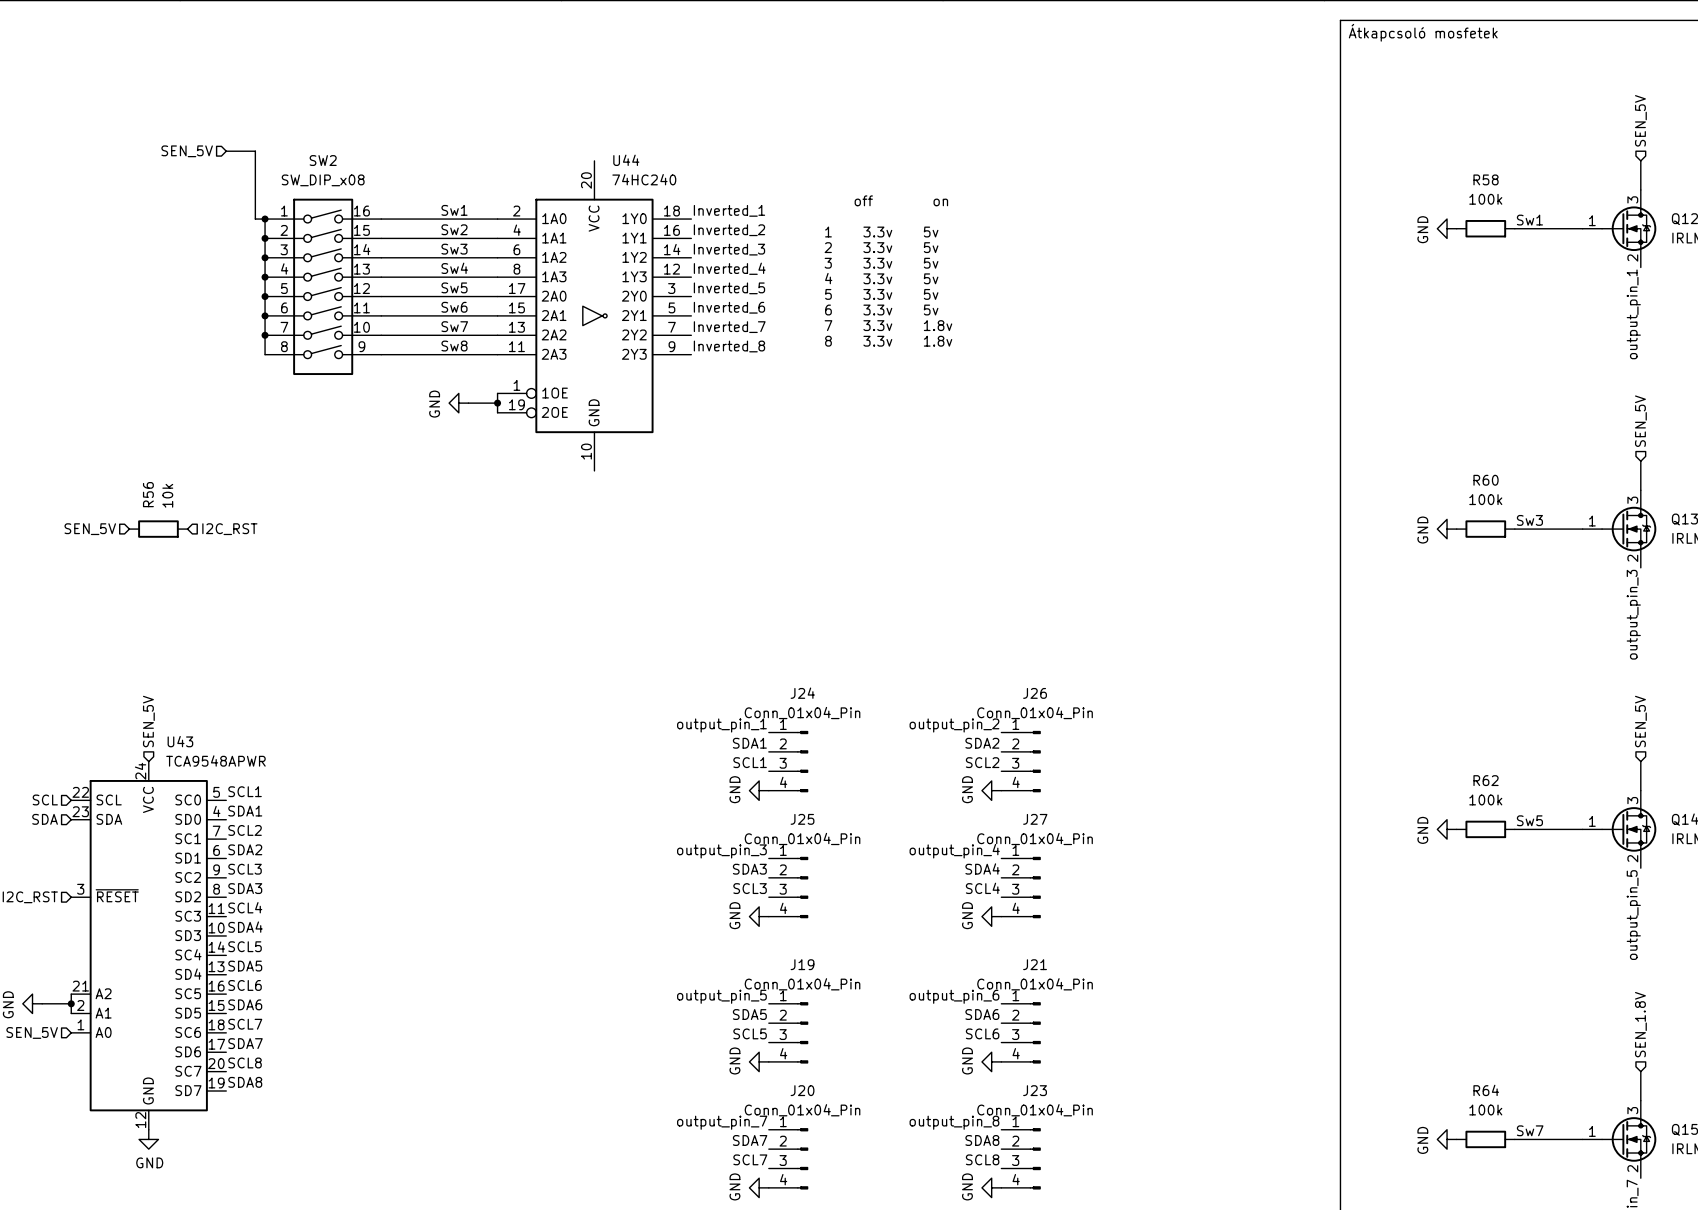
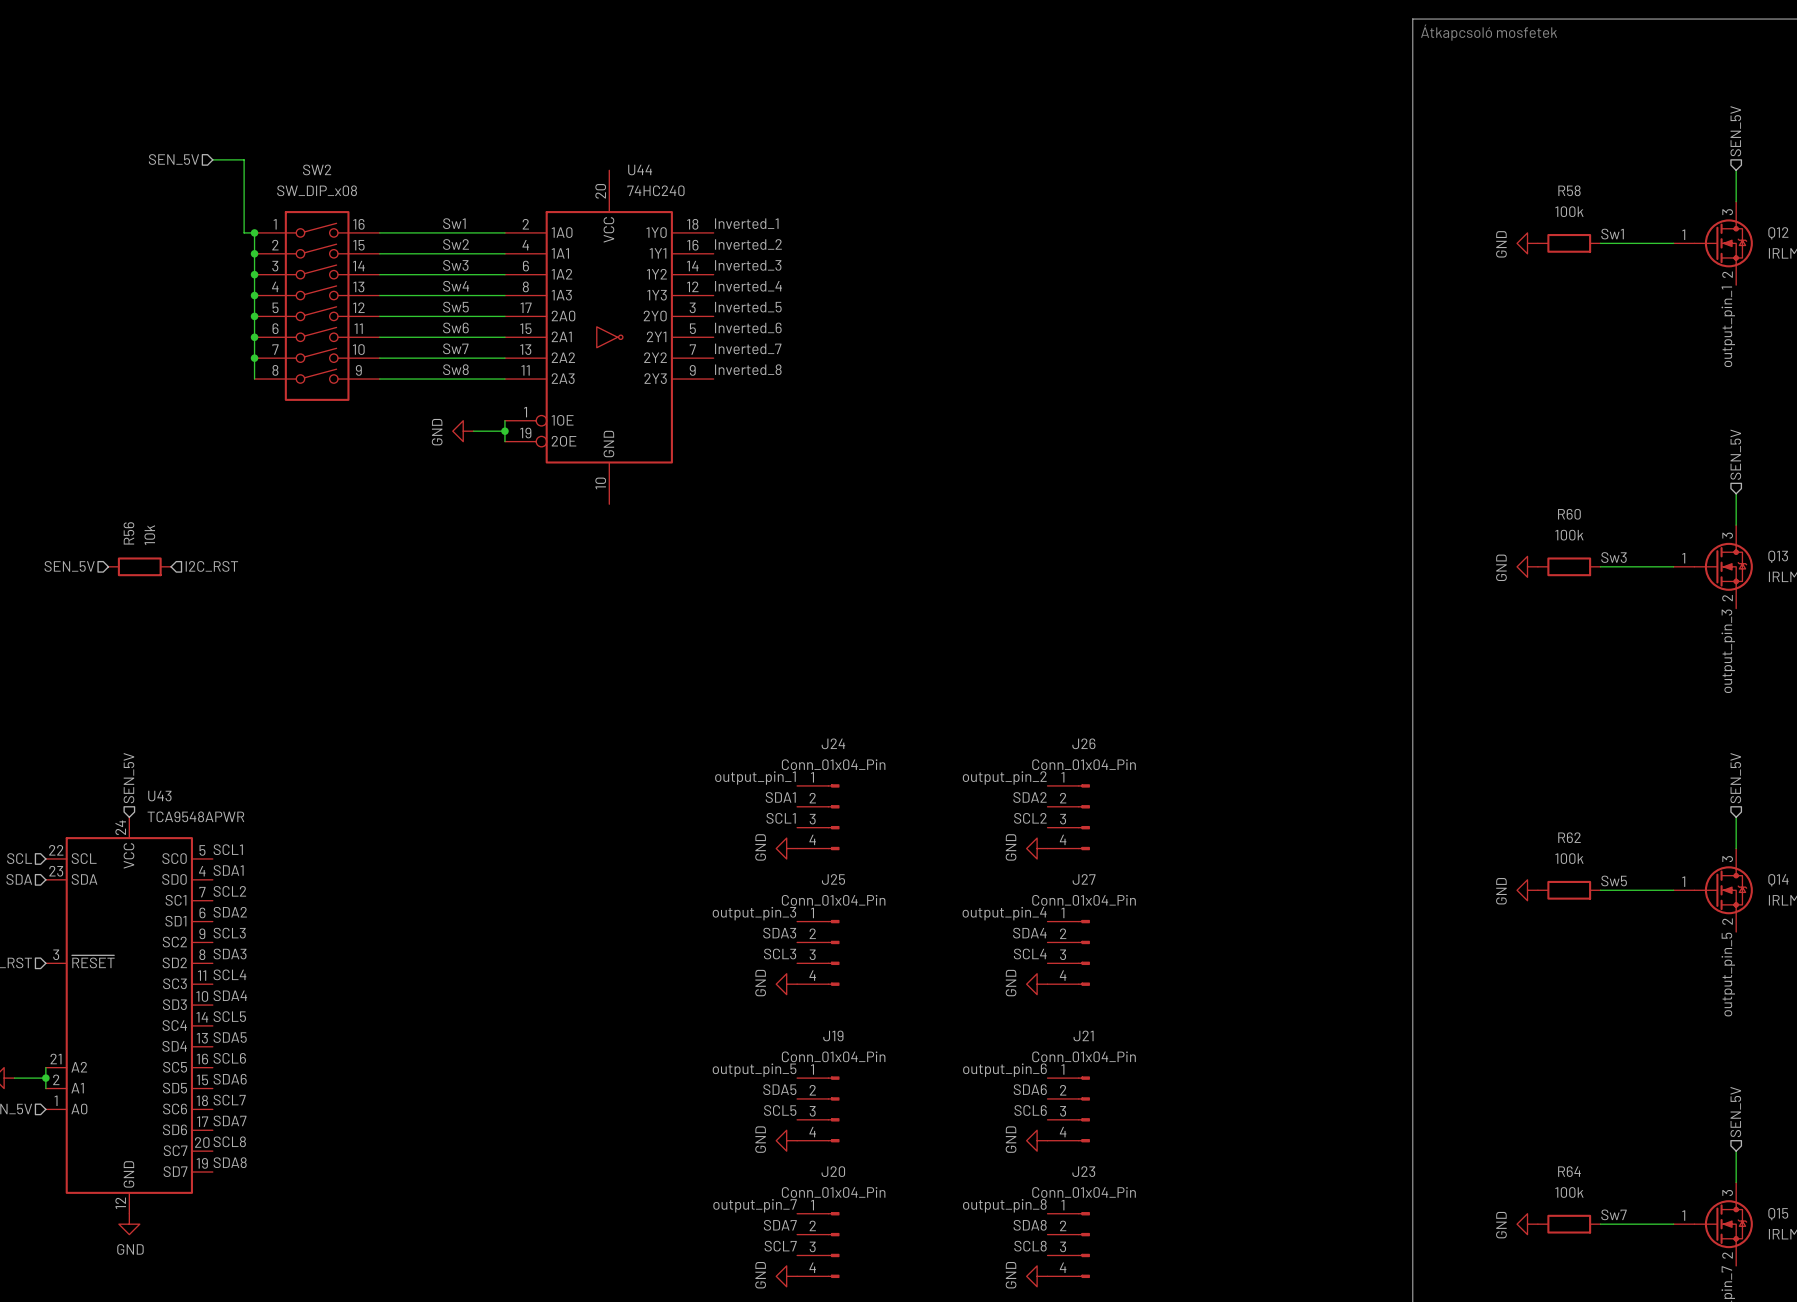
text: off on (901, 200) -> none
text: 1 3.3v 5v (881, 232) -> none
text: 2 3.3v 5v (881, 247) -> none
text: 3 3.3v 5v (881, 263) -> none
text: 4 3.3v 5v (881, 278) -> none
text: 5 3.3v 5v (881, 294) -> none
text: 6 3.3v 5v (881, 310) -> none
text: 7 3.3v 1.8v (888, 325) -> none
text: 8 3.3v 1.8v (888, 341) -> none
hierarchical label: SEN_1.8V (1640, 1024) -> SEN_5V (1735, 1112)

